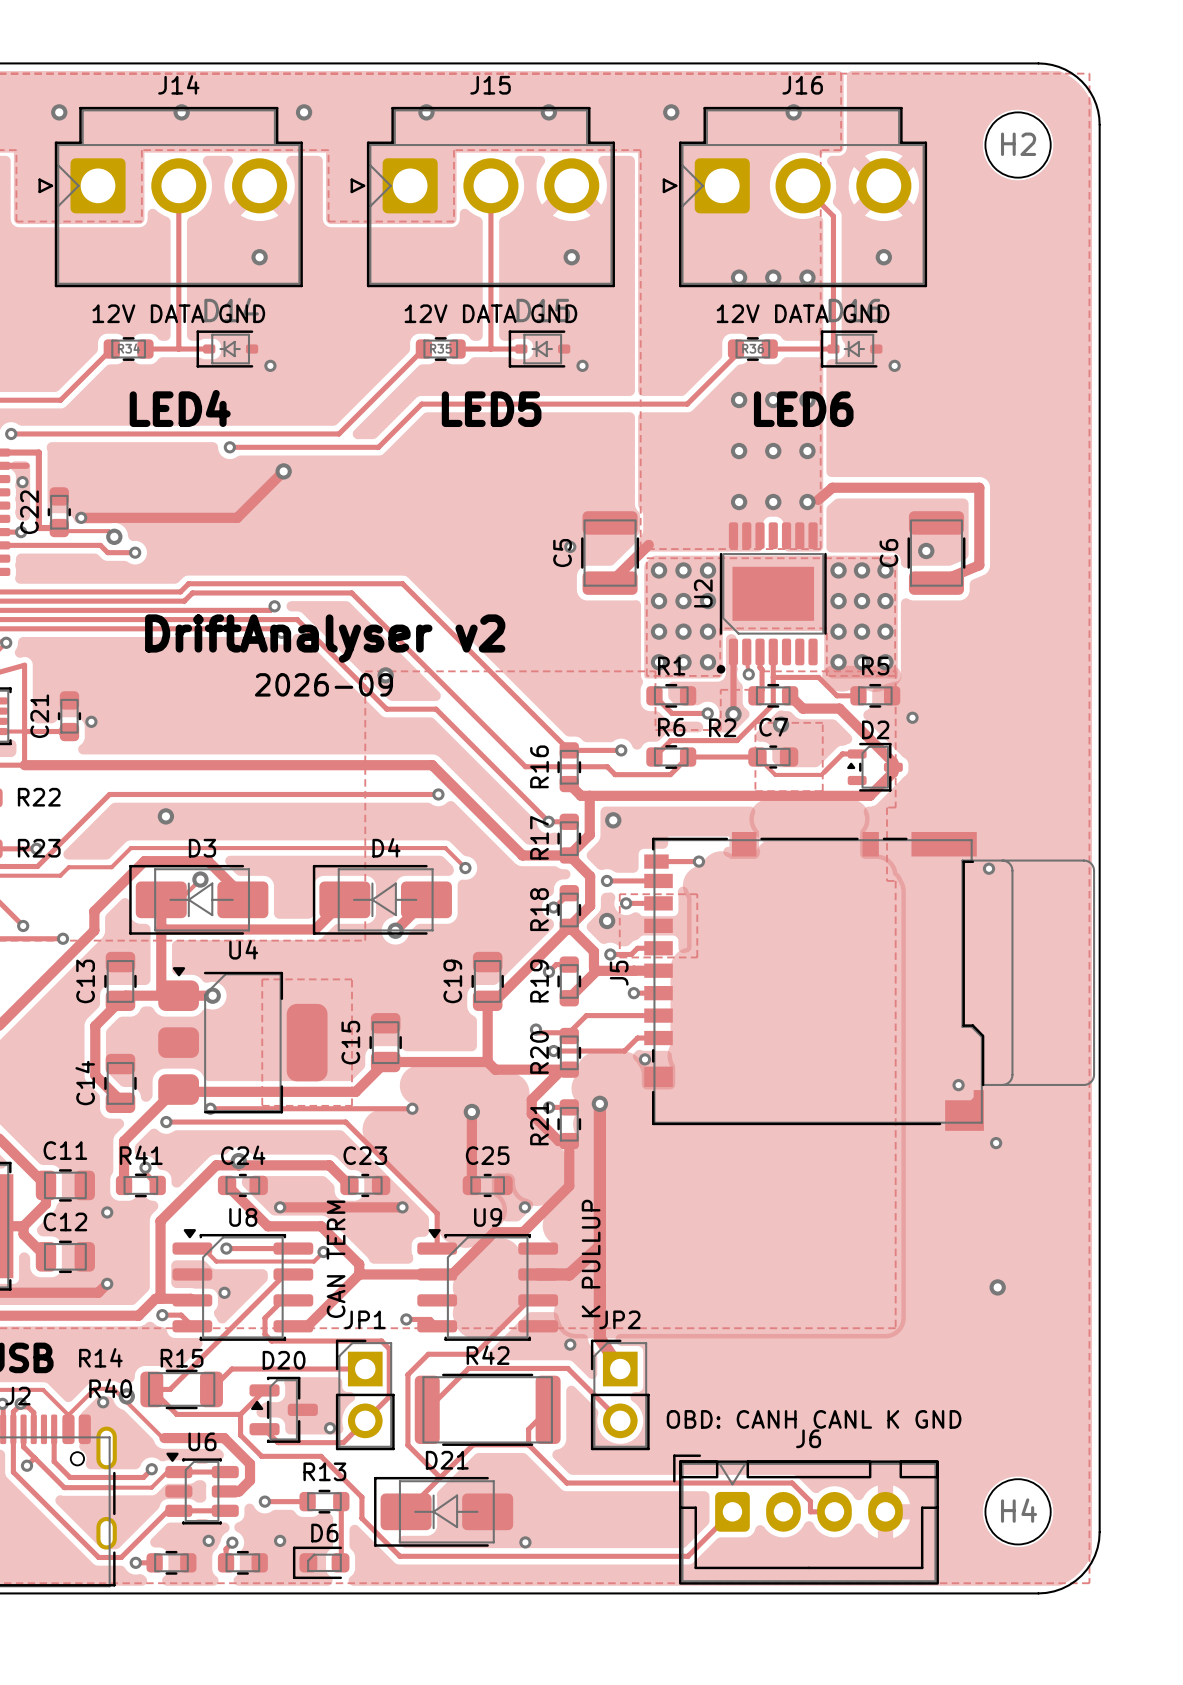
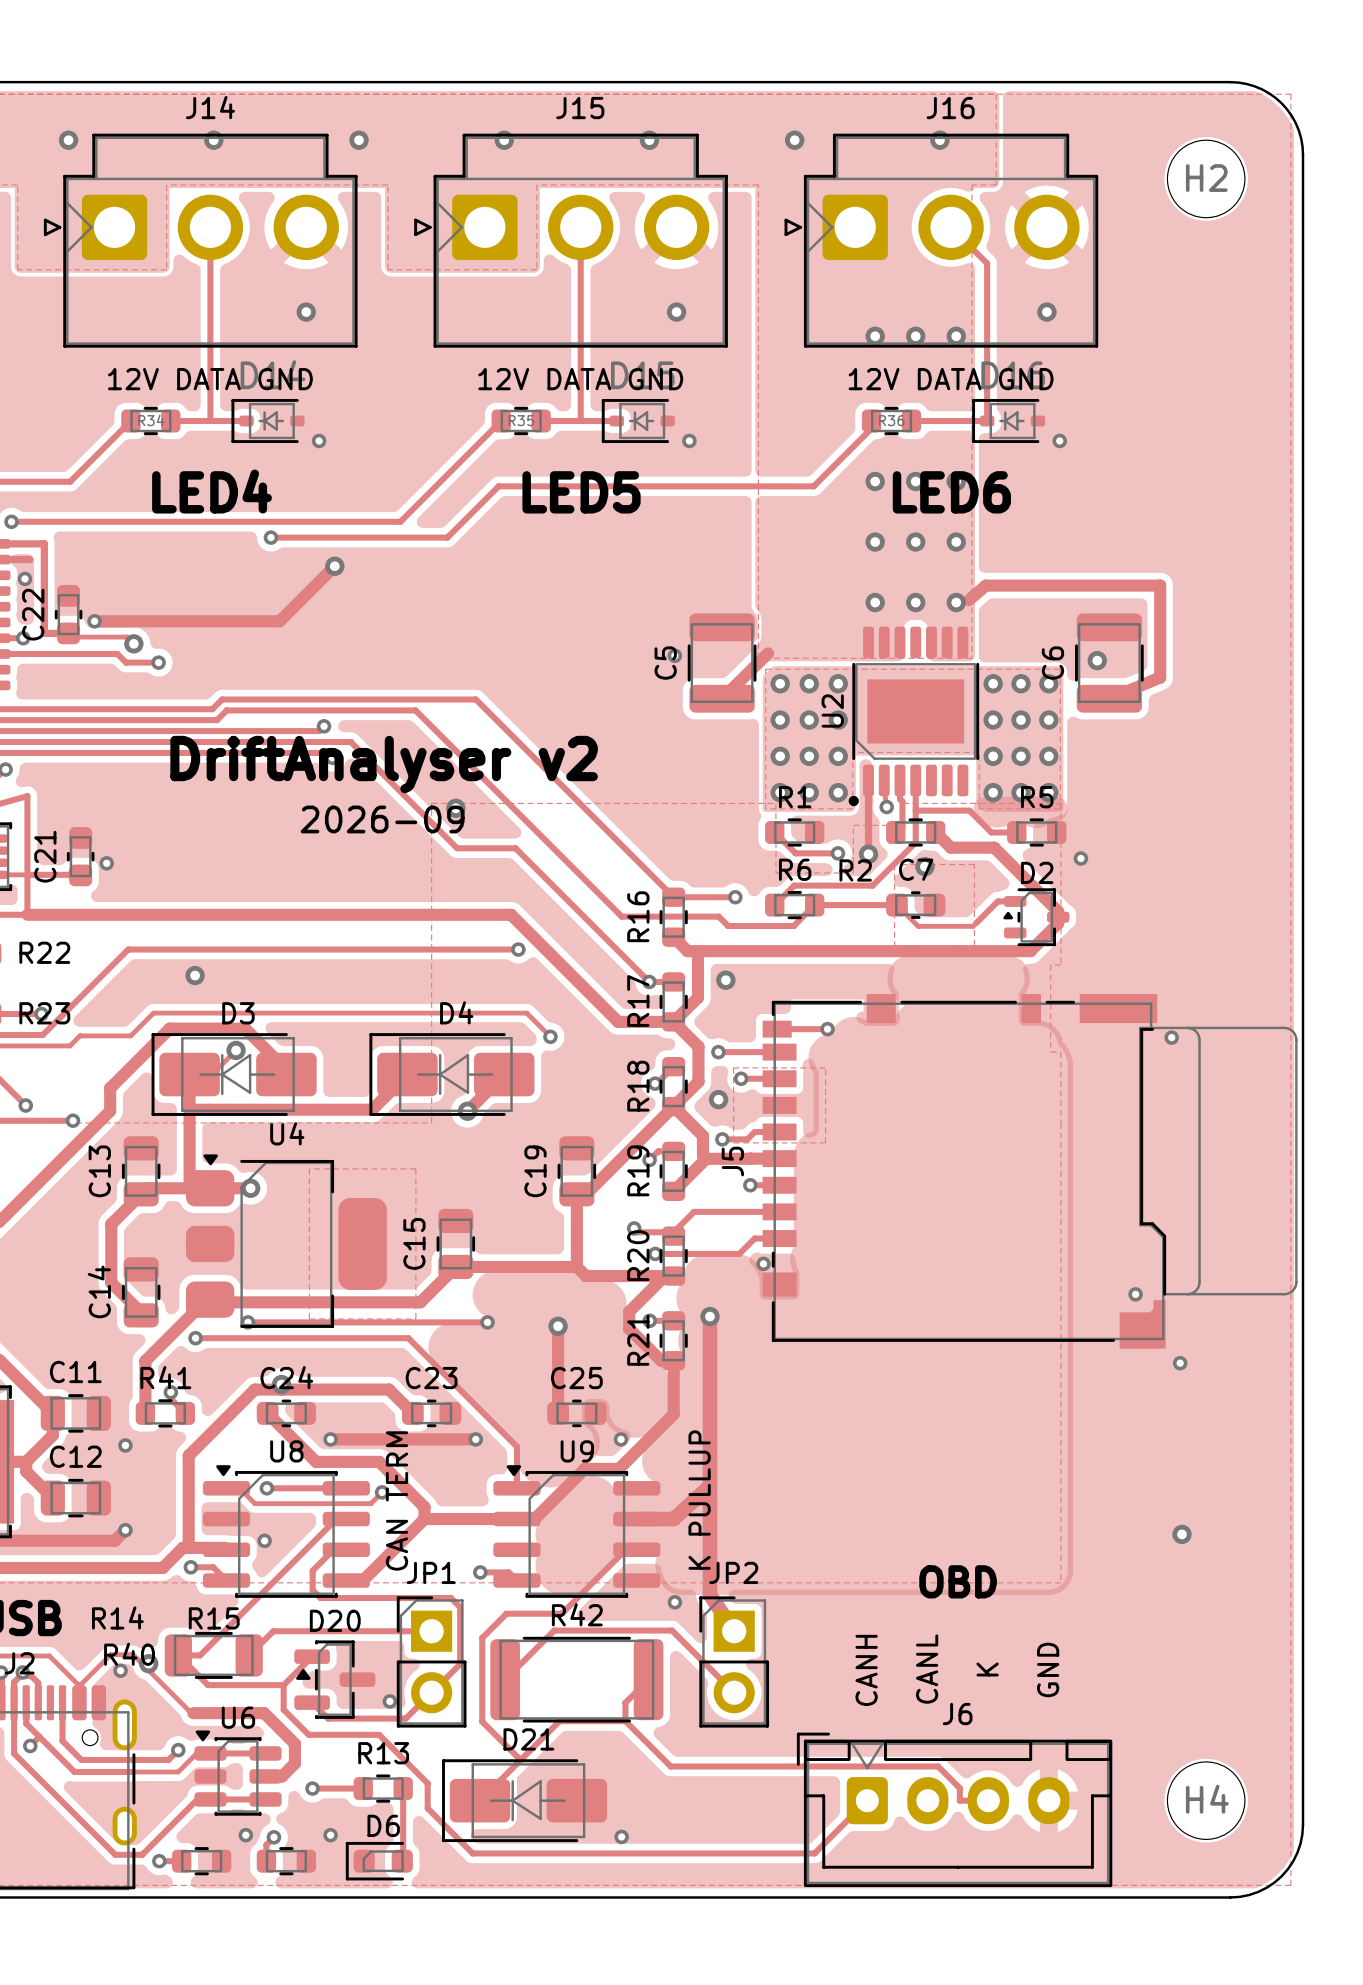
text: none -> OBD (958, 1581)
text: none -> CANL (927, 1669)
text: none -> K (987, 1669)
text: none -> GND (1048, 1669)
text: none -> CANH (866, 1670)
text: OBD: CANH CANL K GND (814, 1419) -> none

